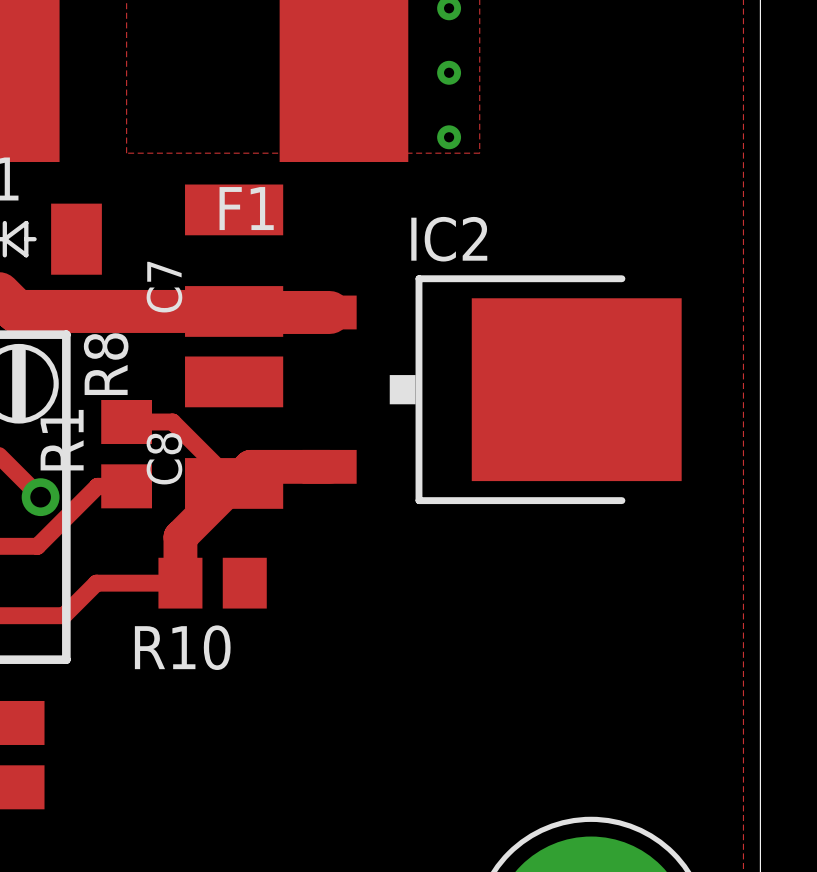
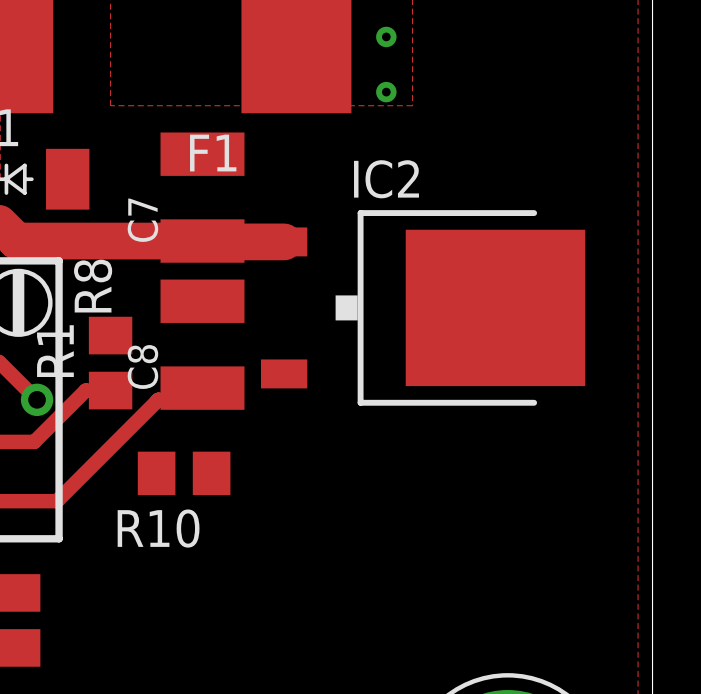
track: (126, 422) (172, 422) (234, 483) -> none
track: (329, 466) (250, 466) (180, 537) (180, 583) (96, 583) -> (195, 388) (184, 399) (158, 399) (84, 473)

